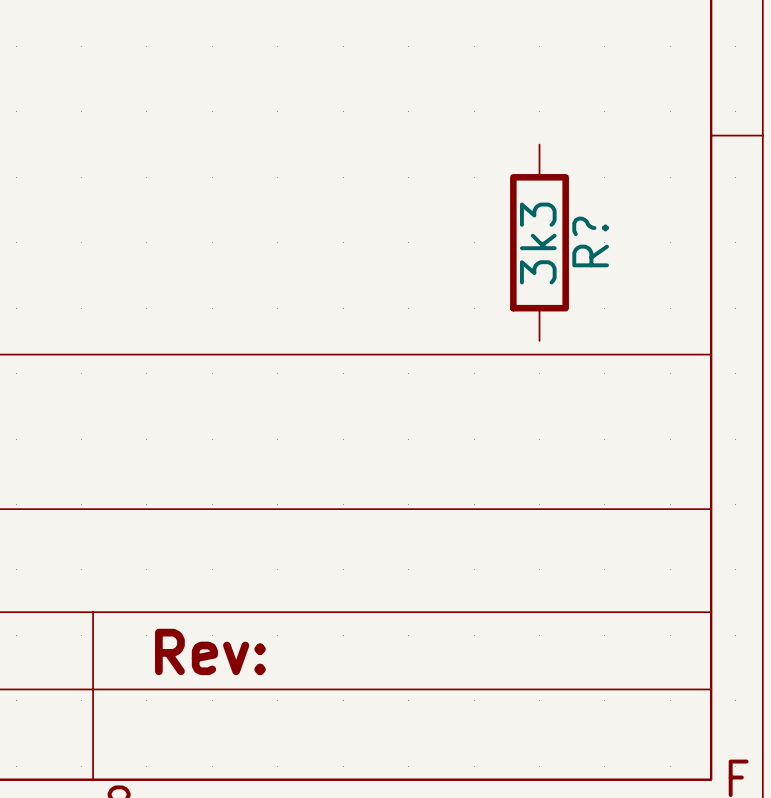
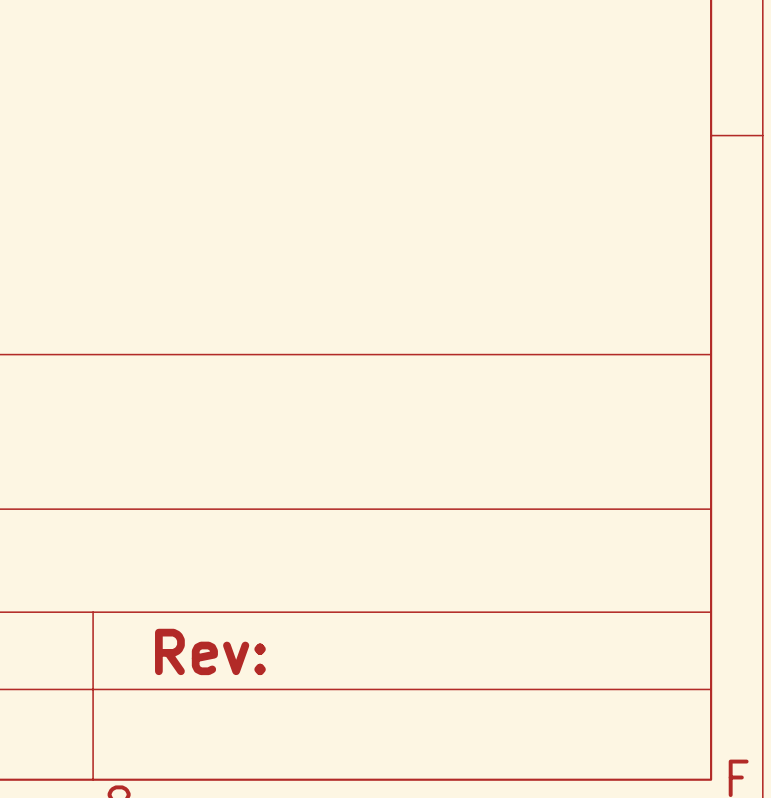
R?: 3k3 (539, 242) -> none

